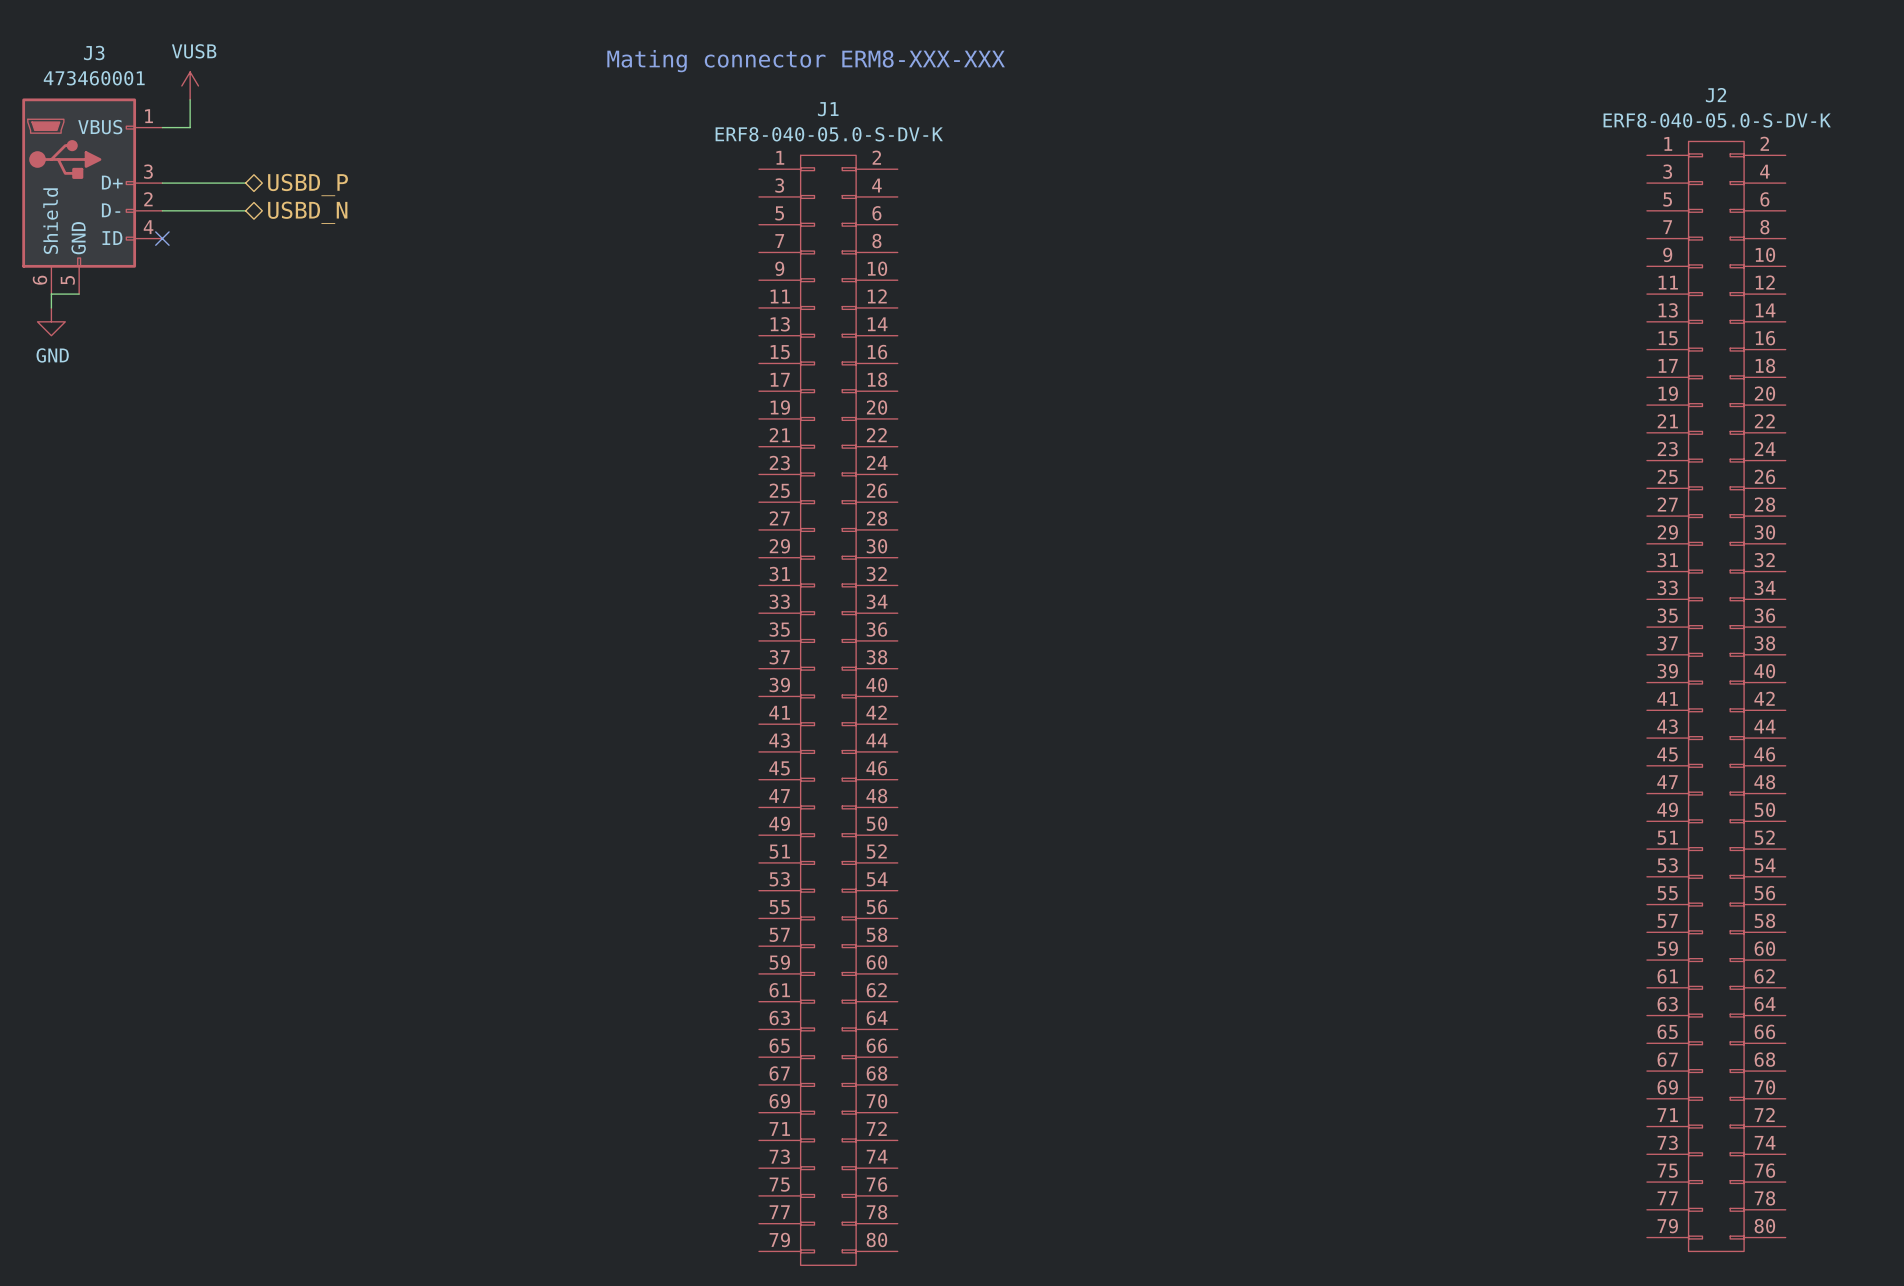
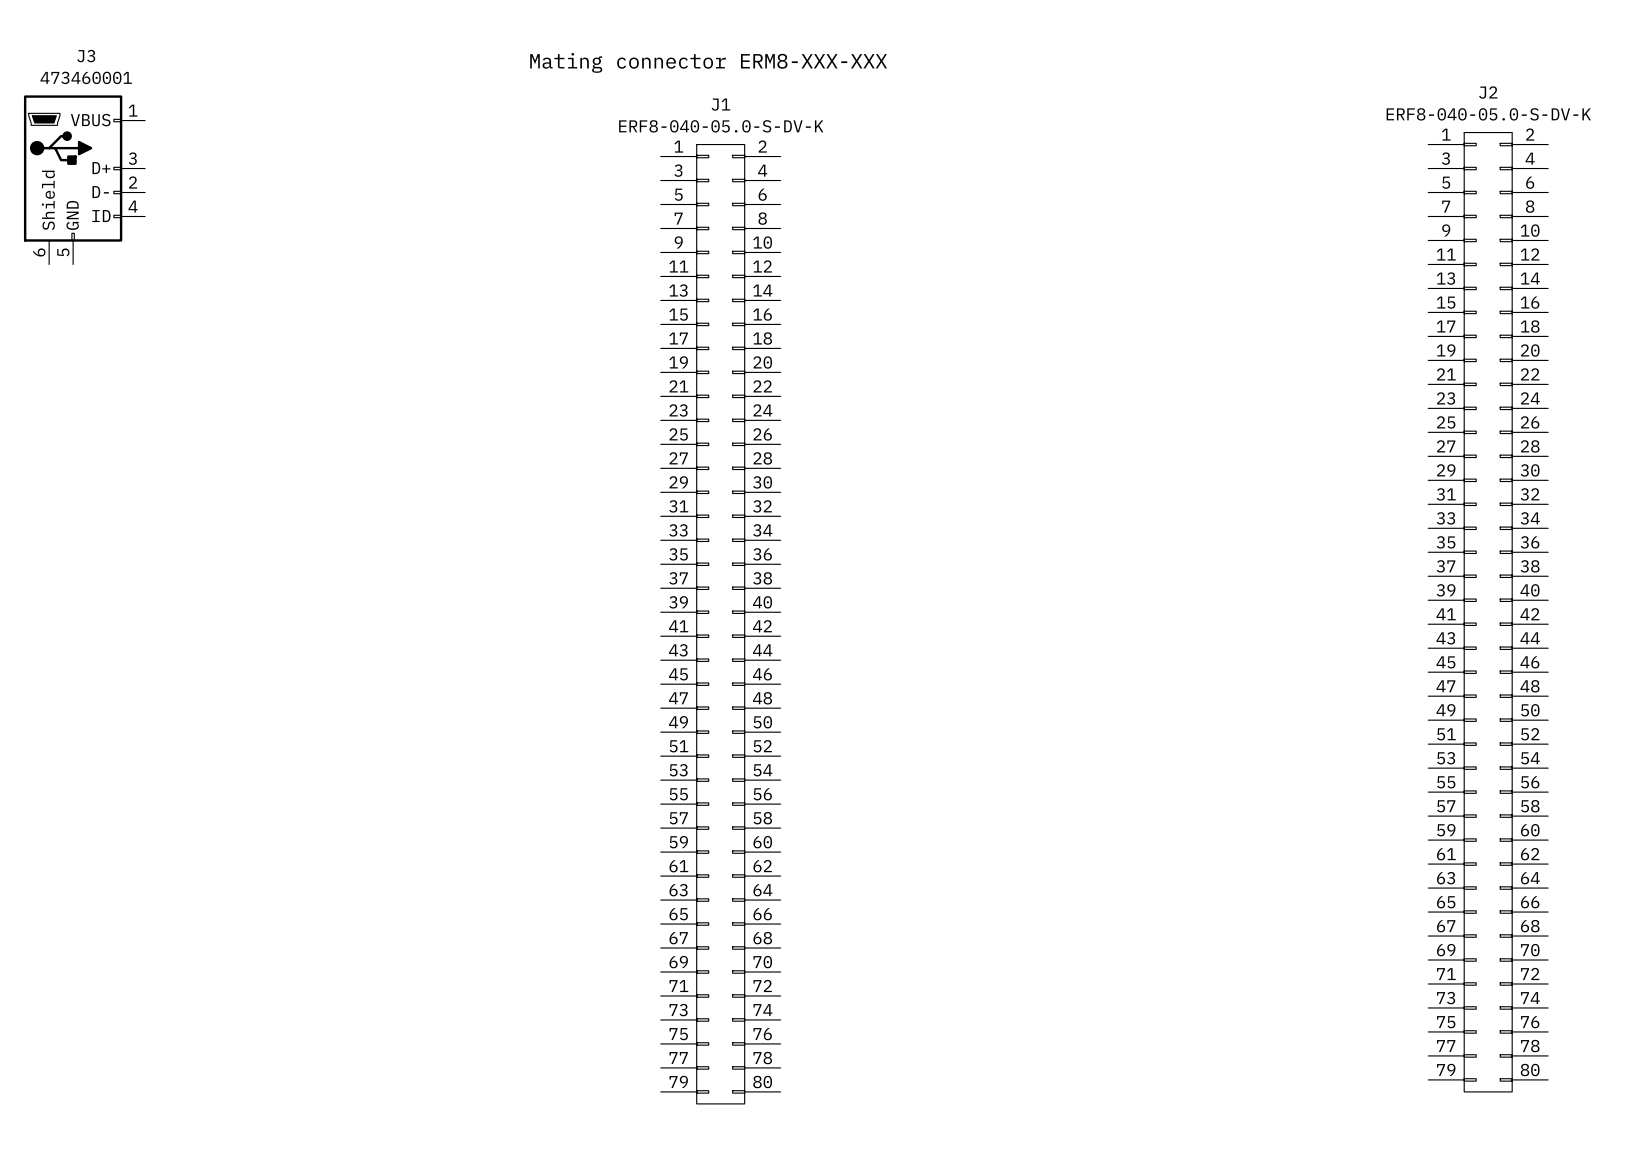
power symbol: VUSB (190, 85) -> none
wire: (190, 99) (190, 127) (162, 127) -> none
wire: (162, 183) (245, 183) -> none
hierarchical label: USBD_P (308, 185) -> none
wire: (162, 210) (245, 210) -> none
hierarchical label: USBD_N (307, 212) -> none
no-connect mark: (162, 238) -> none
wire: (79, 294) (51, 294) (51, 307) -> none
power symbol: GND (51, 321) -> none

